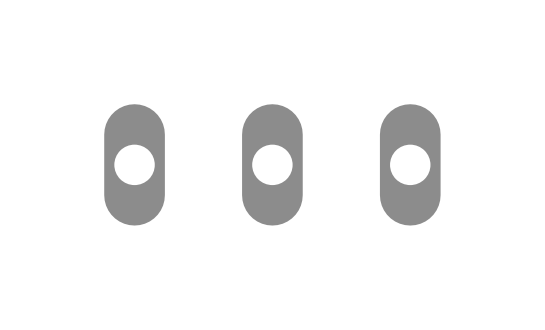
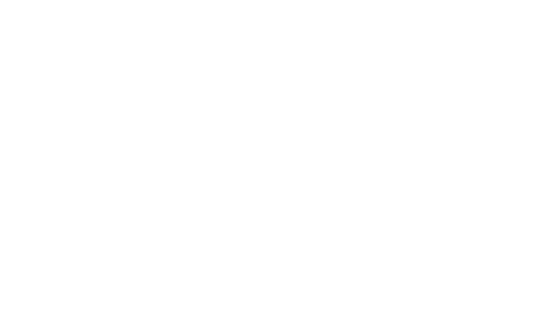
part: (272, 164) -> none

